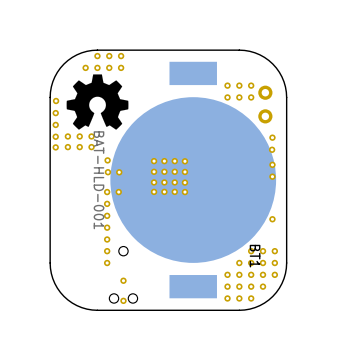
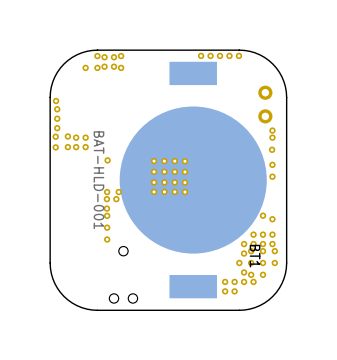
part: none -> (201, 55)
part: none -> (210, 55)
part: none -> (220, 55)
part: none -> (229, 55)
part: none -> (238, 55)
part: (109, 56) -> none
part: none -> (104, 57)
part: none -> (114, 57)
BT1 footprint: [110, 61, 277, 299] -> [119, 61, 267, 299]
part: none -> (104, 66)
part: none -> (114, 66)
part: (109, 67) -> none
drawing: [66, 74, 129, 130] -> none
part: (227, 85) -> none
part: (239, 85) -> none
part: (251, 85) -> none
part: (227, 97) -> none
part: (239, 97) -> none
part: (251, 97) -> none
part: none -> (57, 109)
part: (55, 113) -> none
part: none -> (57, 118)
part: (55, 124) -> none
part: none -> (57, 128)
part: none -> (272, 130)
part: (79, 136) -> none
part: (91, 136) -> none
part: none -> (76, 137)
part: none -> (85, 137)
part: none -> (76, 147)
part: (79, 147) -> none
part: none -> (85, 147)
part: (91, 147) -> none
part: (107, 172) -> none
part: (119, 172) -> none
part: none -> (106, 199)
part: none -> (116, 199)
part: (107, 203) -> none
part: none -> (106, 208)
part: none -> (263, 215)
part: none -> (253, 234)
part: none -> (263, 234)
part: none -> (272, 234)
part: none -> (244, 244)
part: none -> (253, 244)
part: none -> (263, 244)
part: none -> (272, 244)
part: (107, 251) -> none
part: none -> (244, 253)
part: (107, 263) -> none
part: none -> (244, 272)
part: (227, 274) -> none
part: (239, 274) -> none
part: (274, 274) -> none
part: (123, 280) -> none
part: none -> (225, 281)
part: none -> (234, 281)
part: none -> (244, 281)
part: none -> (253, 281)
part: (227, 286) -> none
part: (239, 286) -> none
part: (251, 286) -> none
part: (263, 286) -> none
part: none -> (225, 291)
part: none -> (234, 291)
part: (227, 298) -> none
part: (239, 298) -> none
part: (251, 298) -> none
part: (123, 300) -> none

